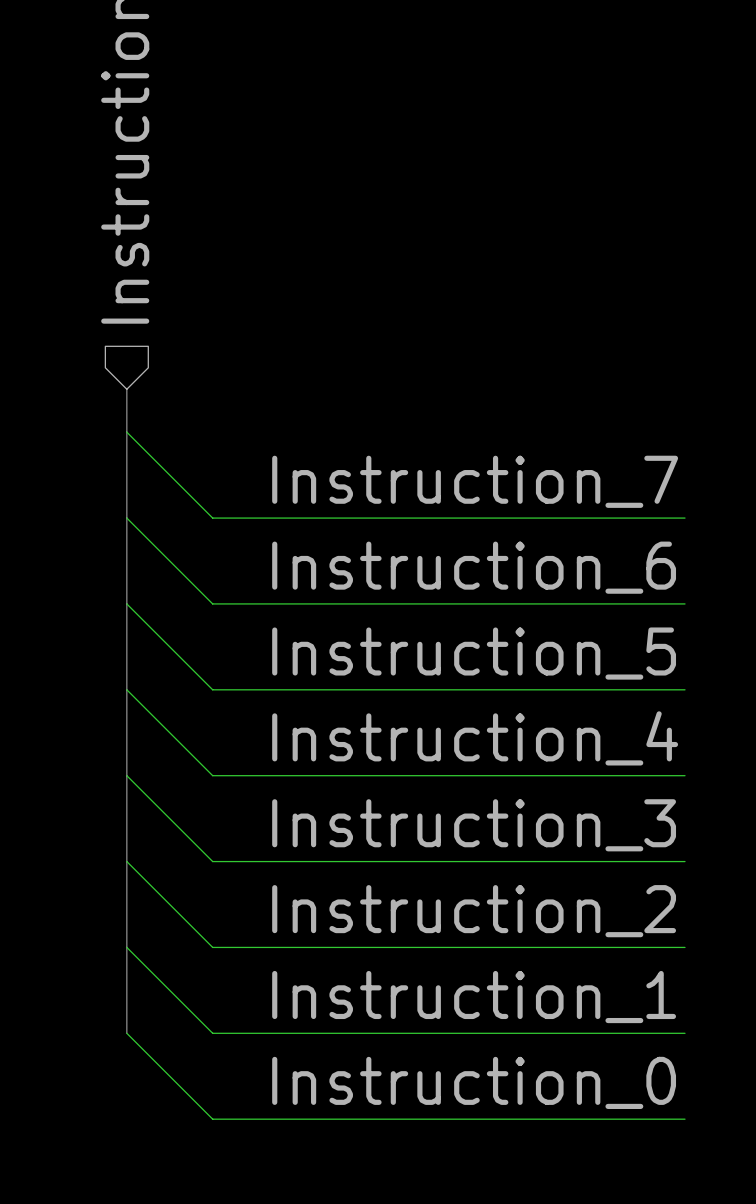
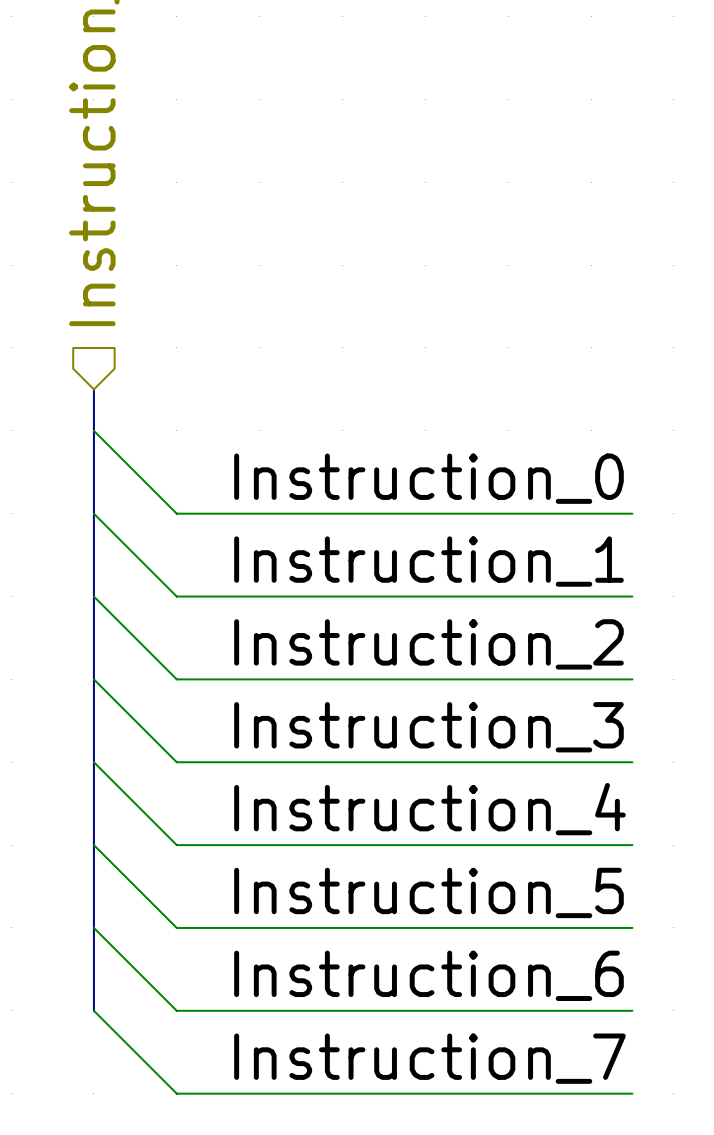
label: Instruction_7 (475, 481) -> Instruction_0 (428, 478)
label: Instruction_6 (474, 567) -> Instruction_1 (428, 561)
label: Instruction_5 (474, 653) -> Instruction_2 (428, 644)
label: Instruction_4 (475, 738) -> Instruction_3 (428, 727)
label: Instruction_3 (474, 825) -> Instruction_4 (429, 809)
label: Instruction_2 (474, 911) -> Instruction_5 (428, 892)
label: Instruction_1 (474, 997) -> Instruction_6 (428, 975)
label: Instruction_0 (474, 1082) -> Instruction_7 (429, 1058)

